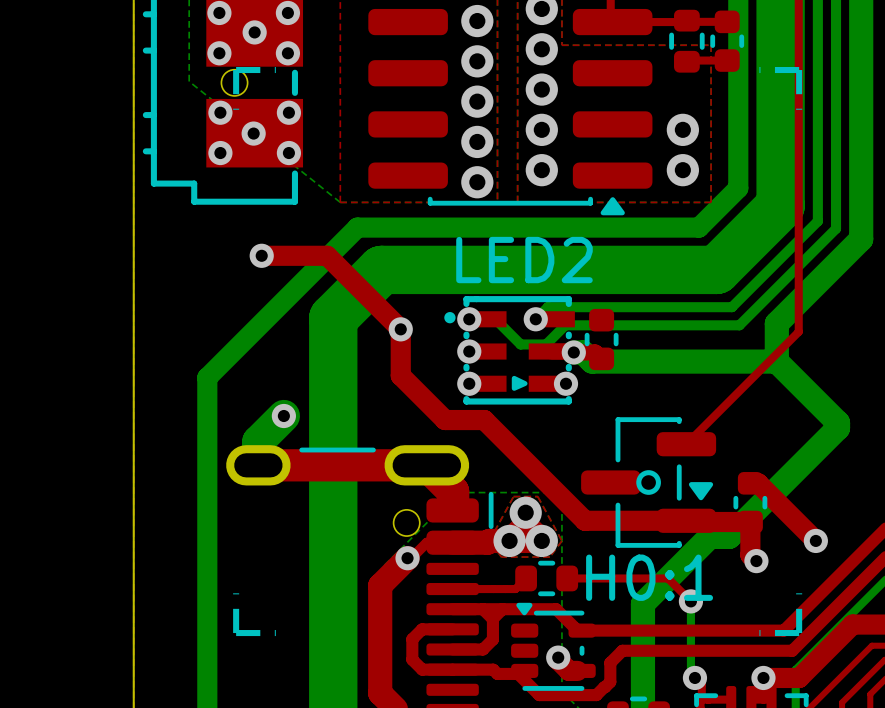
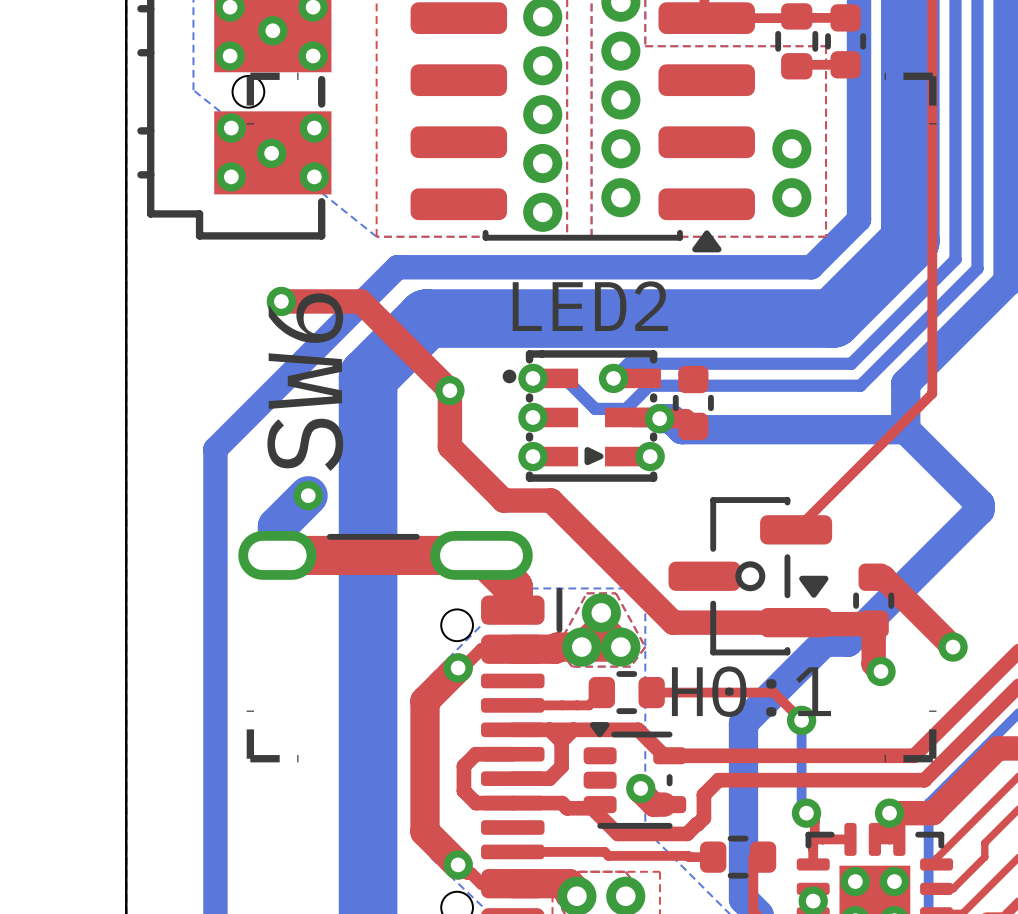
drawing shape: [233, 66, 803, 637] -> [246, 72, 937, 763]

